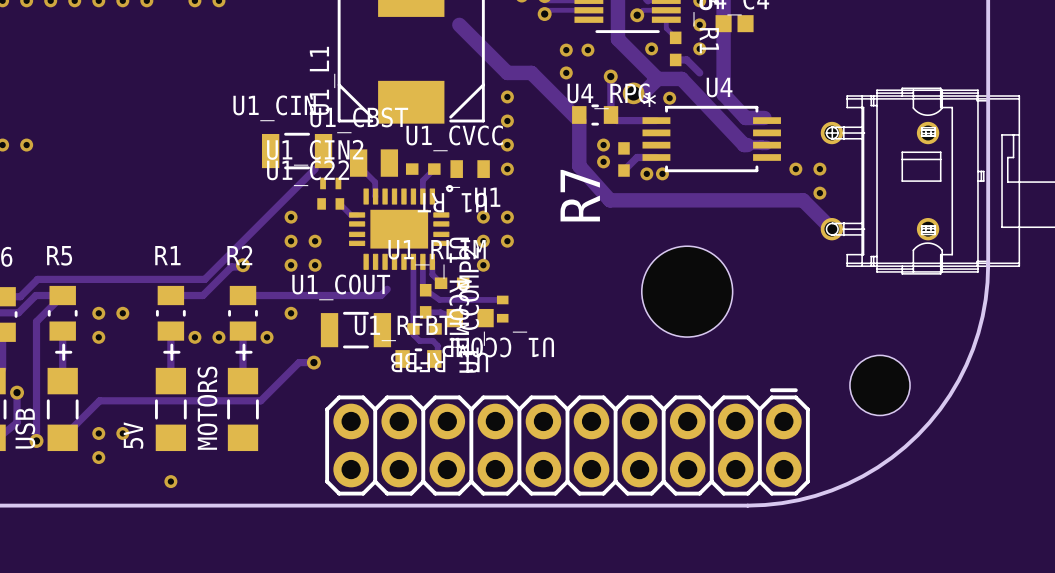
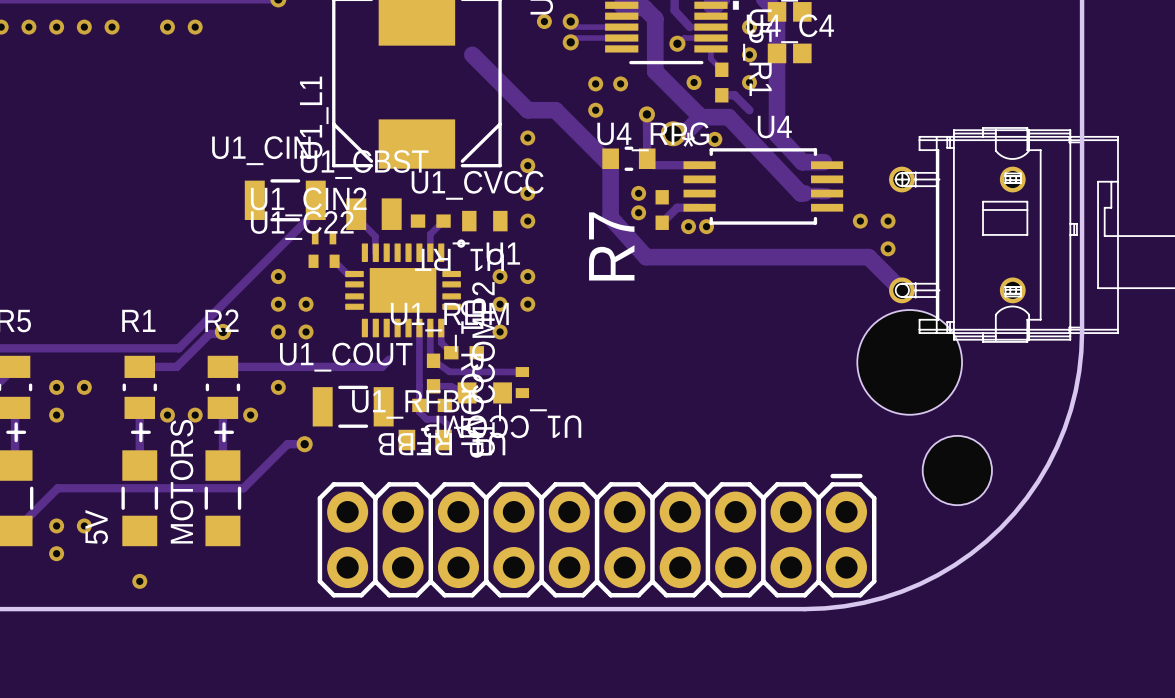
hole position: (687, 291) -> (909, 362)

